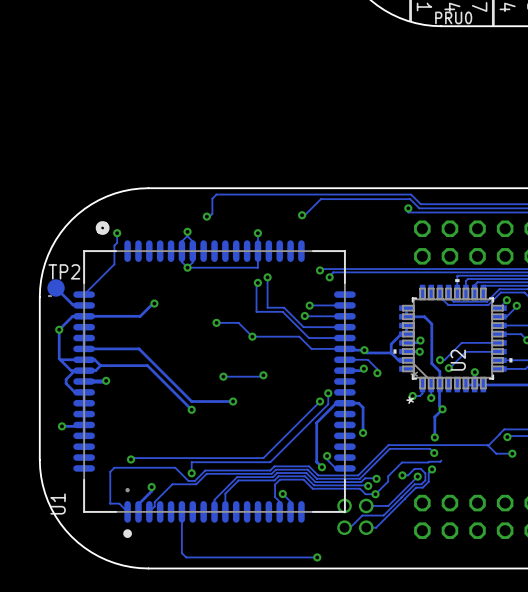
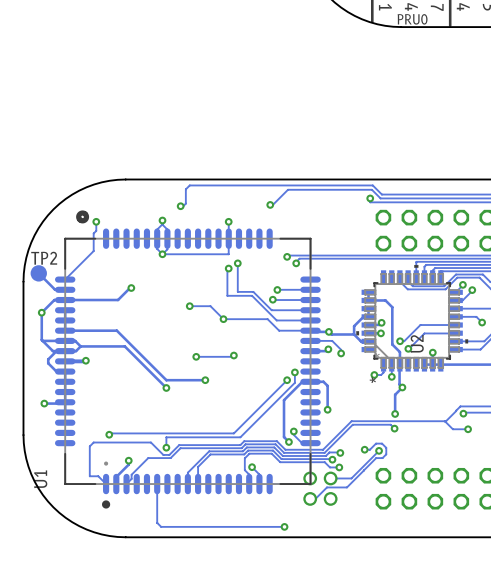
track: (441, 460) (401, 462) (388, 476) (388, 481) (375, 494) -> none
track: (432, 469) (428, 472) (428, 481) (422, 487) (416, 487) (404, 498) -> none
via: (432, 469) -> none
track: (404, 499) (376, 527) (366, 527) -> none

